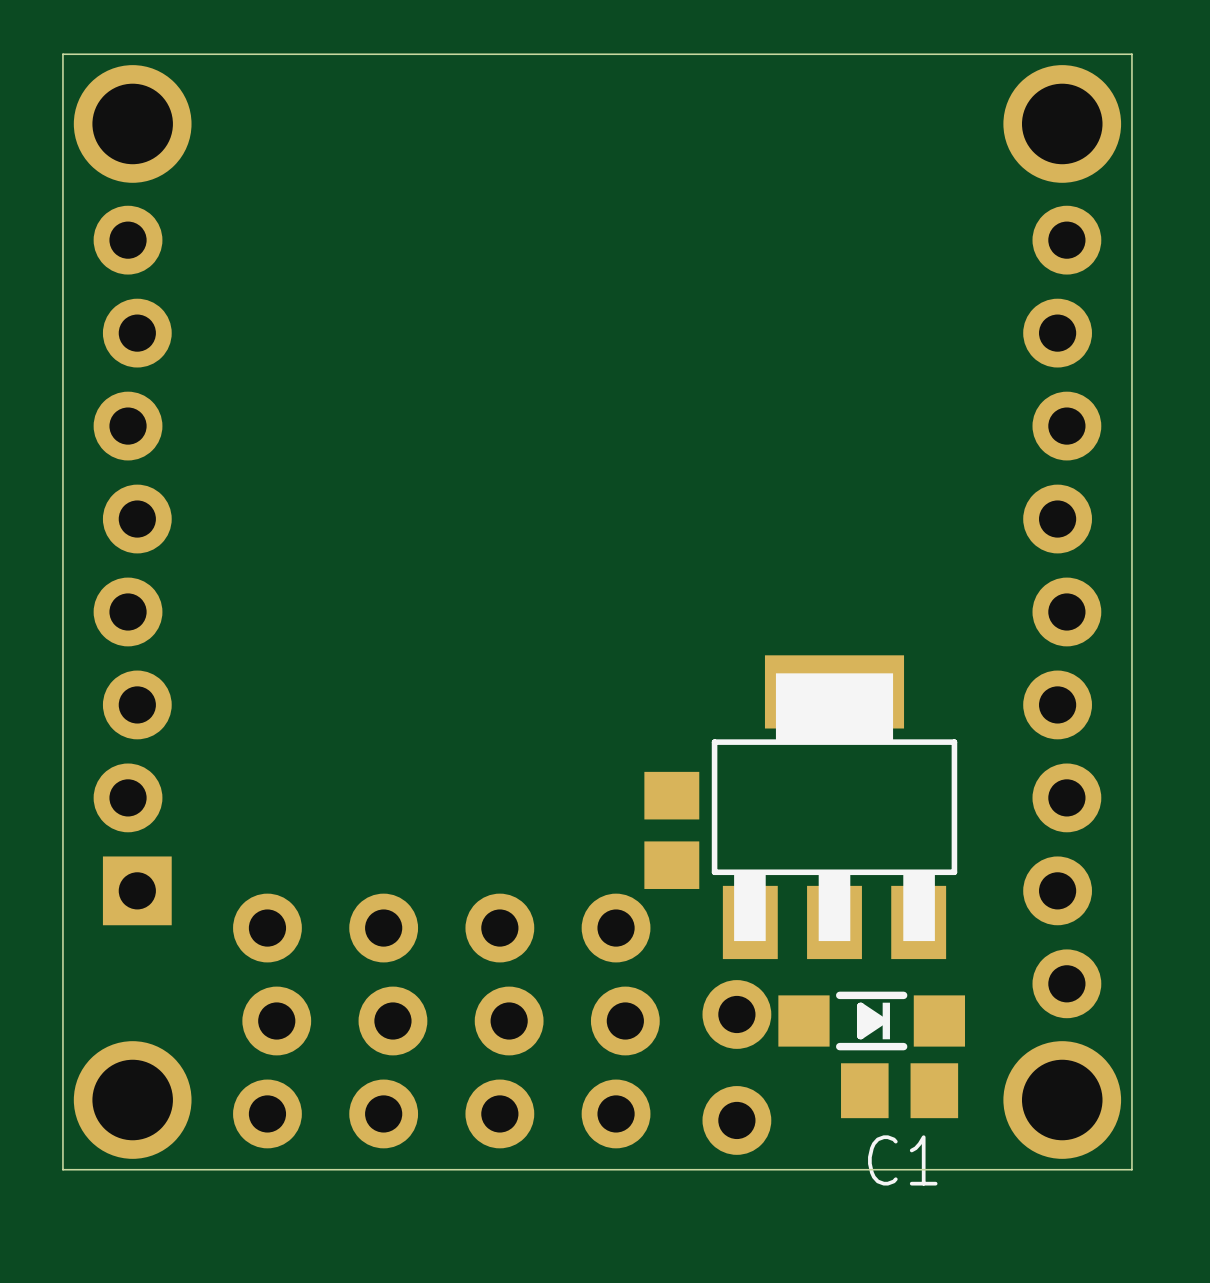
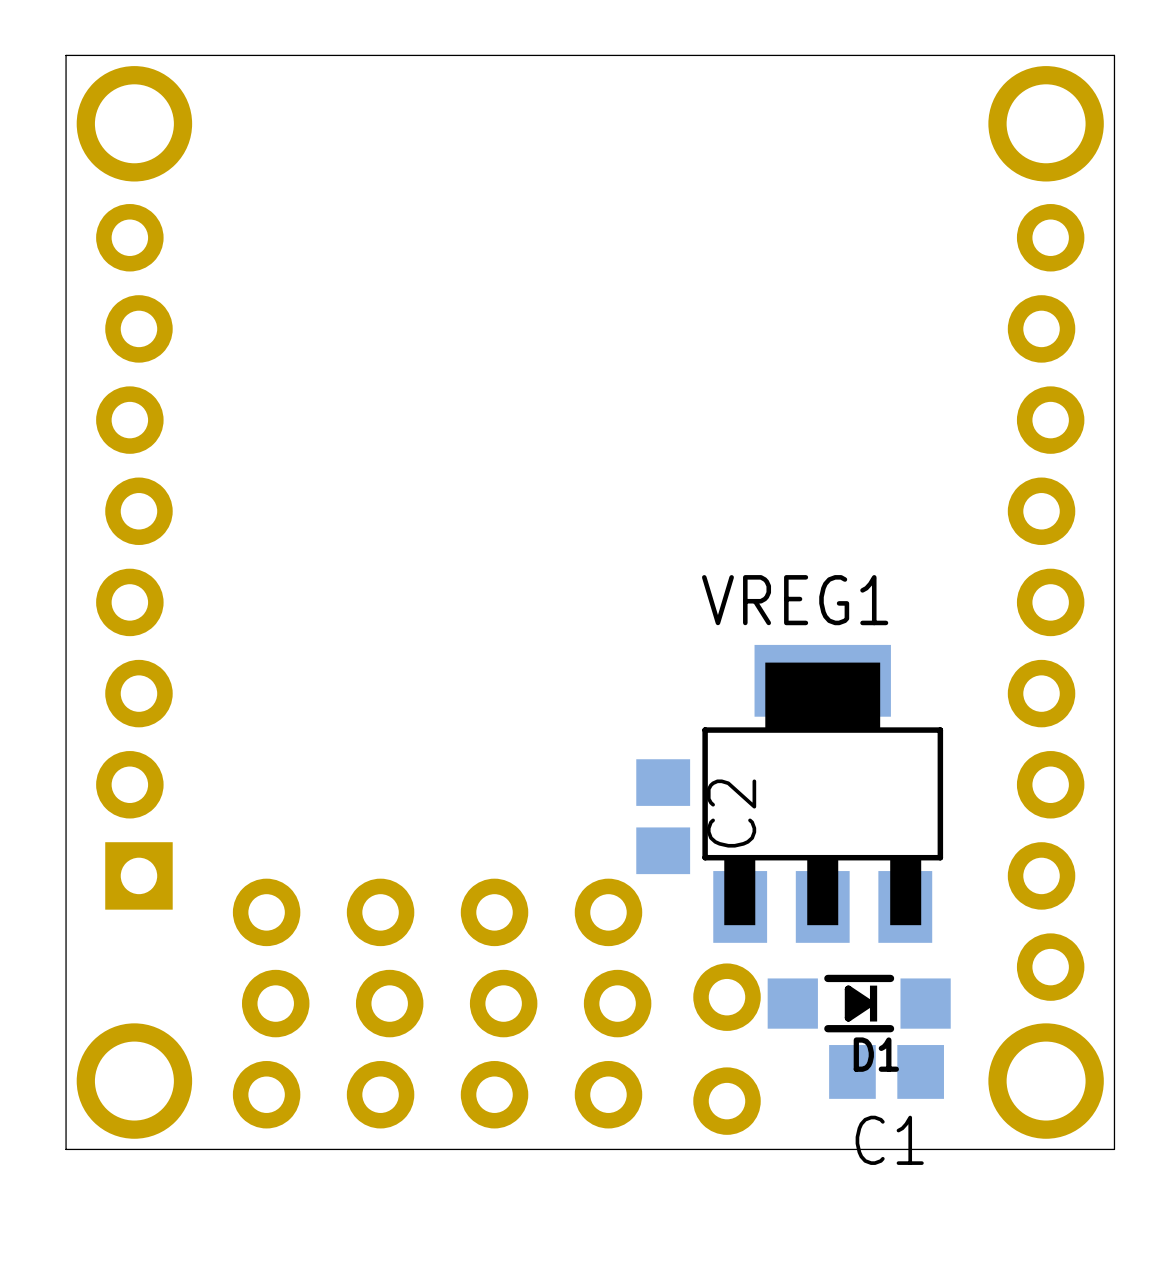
VREG1 name: none -> VREG1 (795, 600)
C2 name: none -> C2 (731, 813)
D1 name: none -> D1 (876, 1054)

